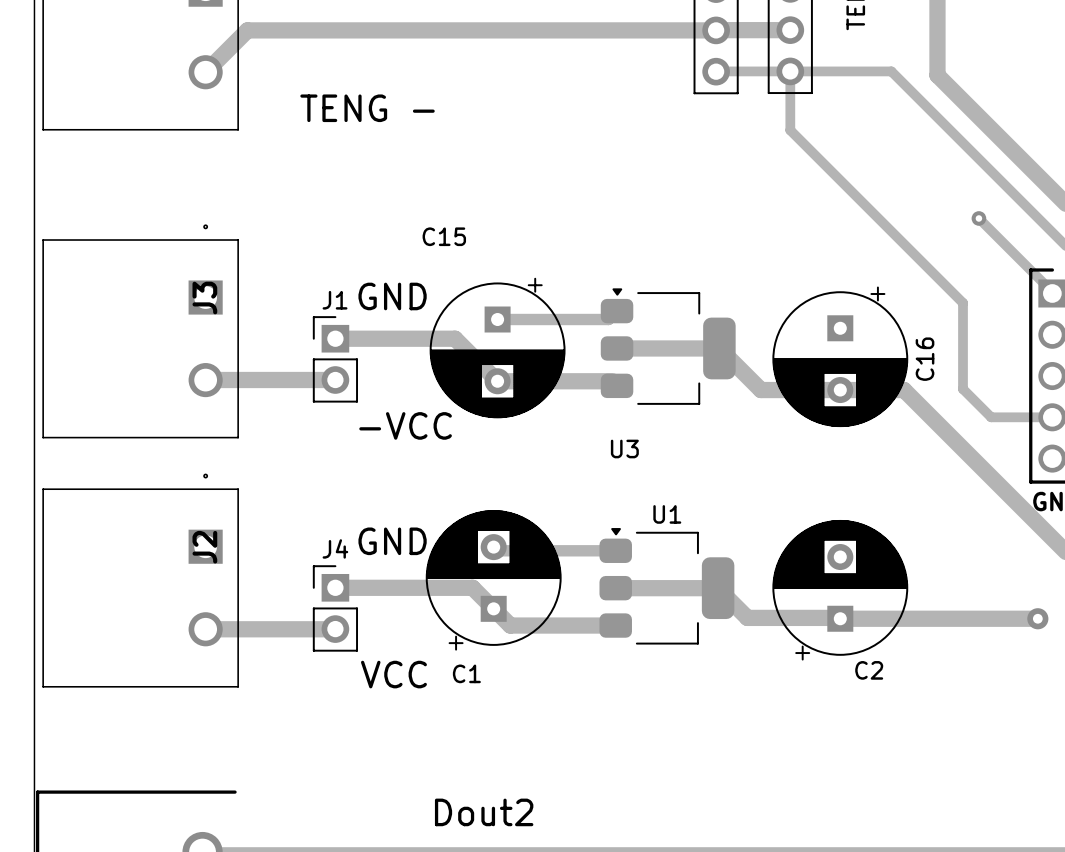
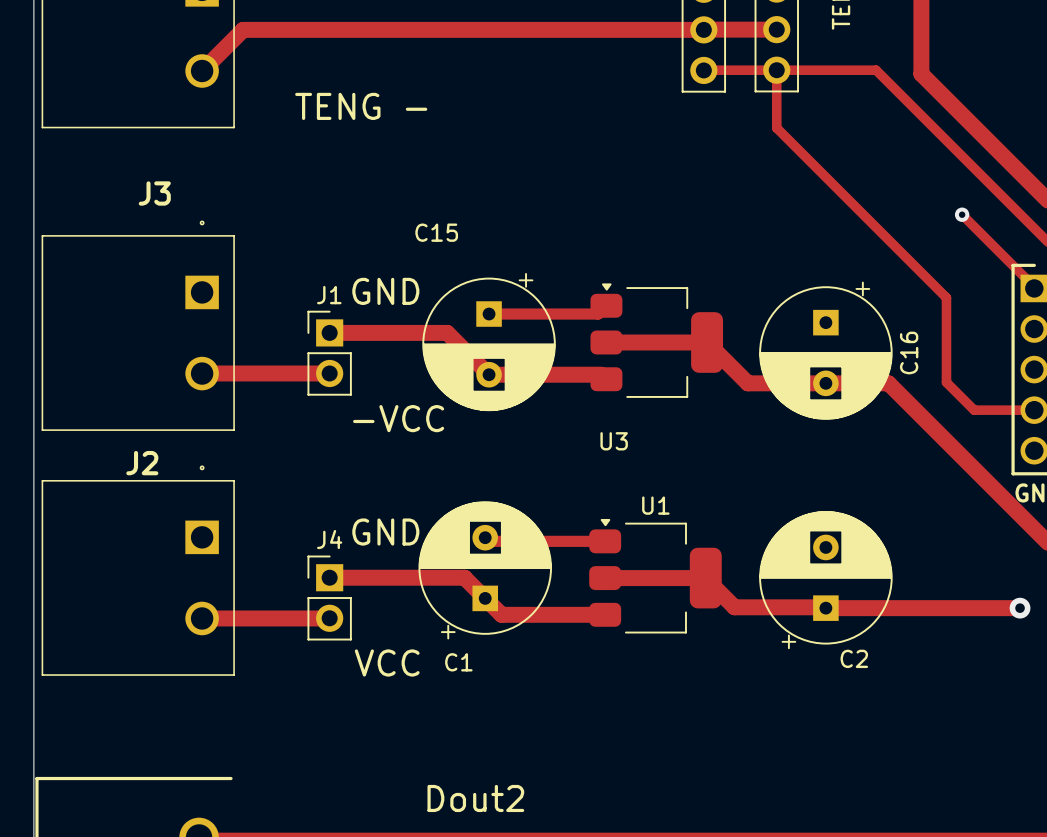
J3 name rotation: 0° (204, 298) -> 90° clockwise (154, 193)
J3 name position: J3 (204, 298) -> J3 (154, 193)
J2 name rotation: 0° (204, 547) -> 90° clockwise (142, 463)
J2 name position: J2 (204, 547) -> J2 (142, 463)

